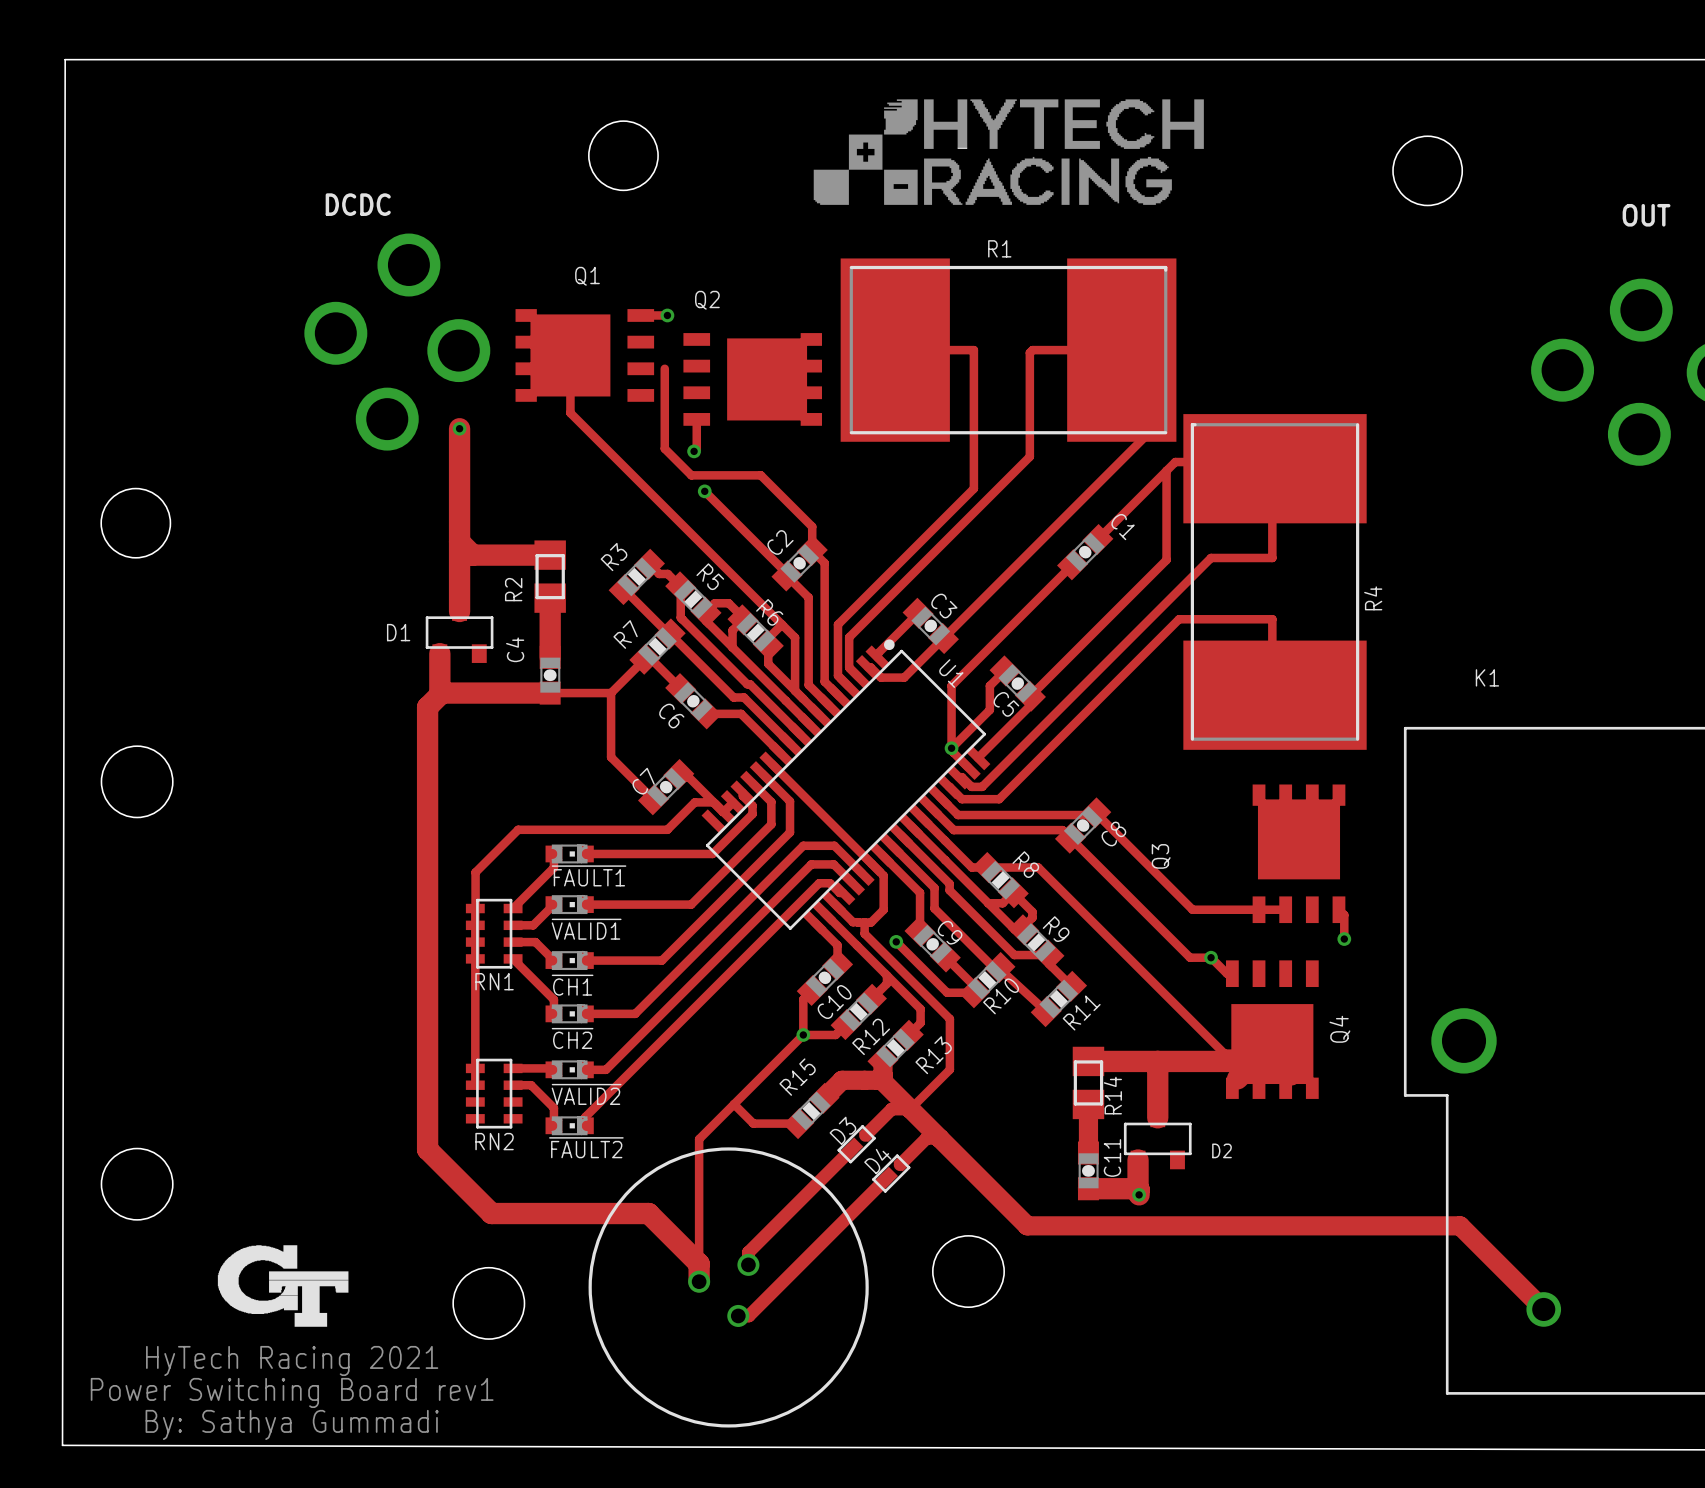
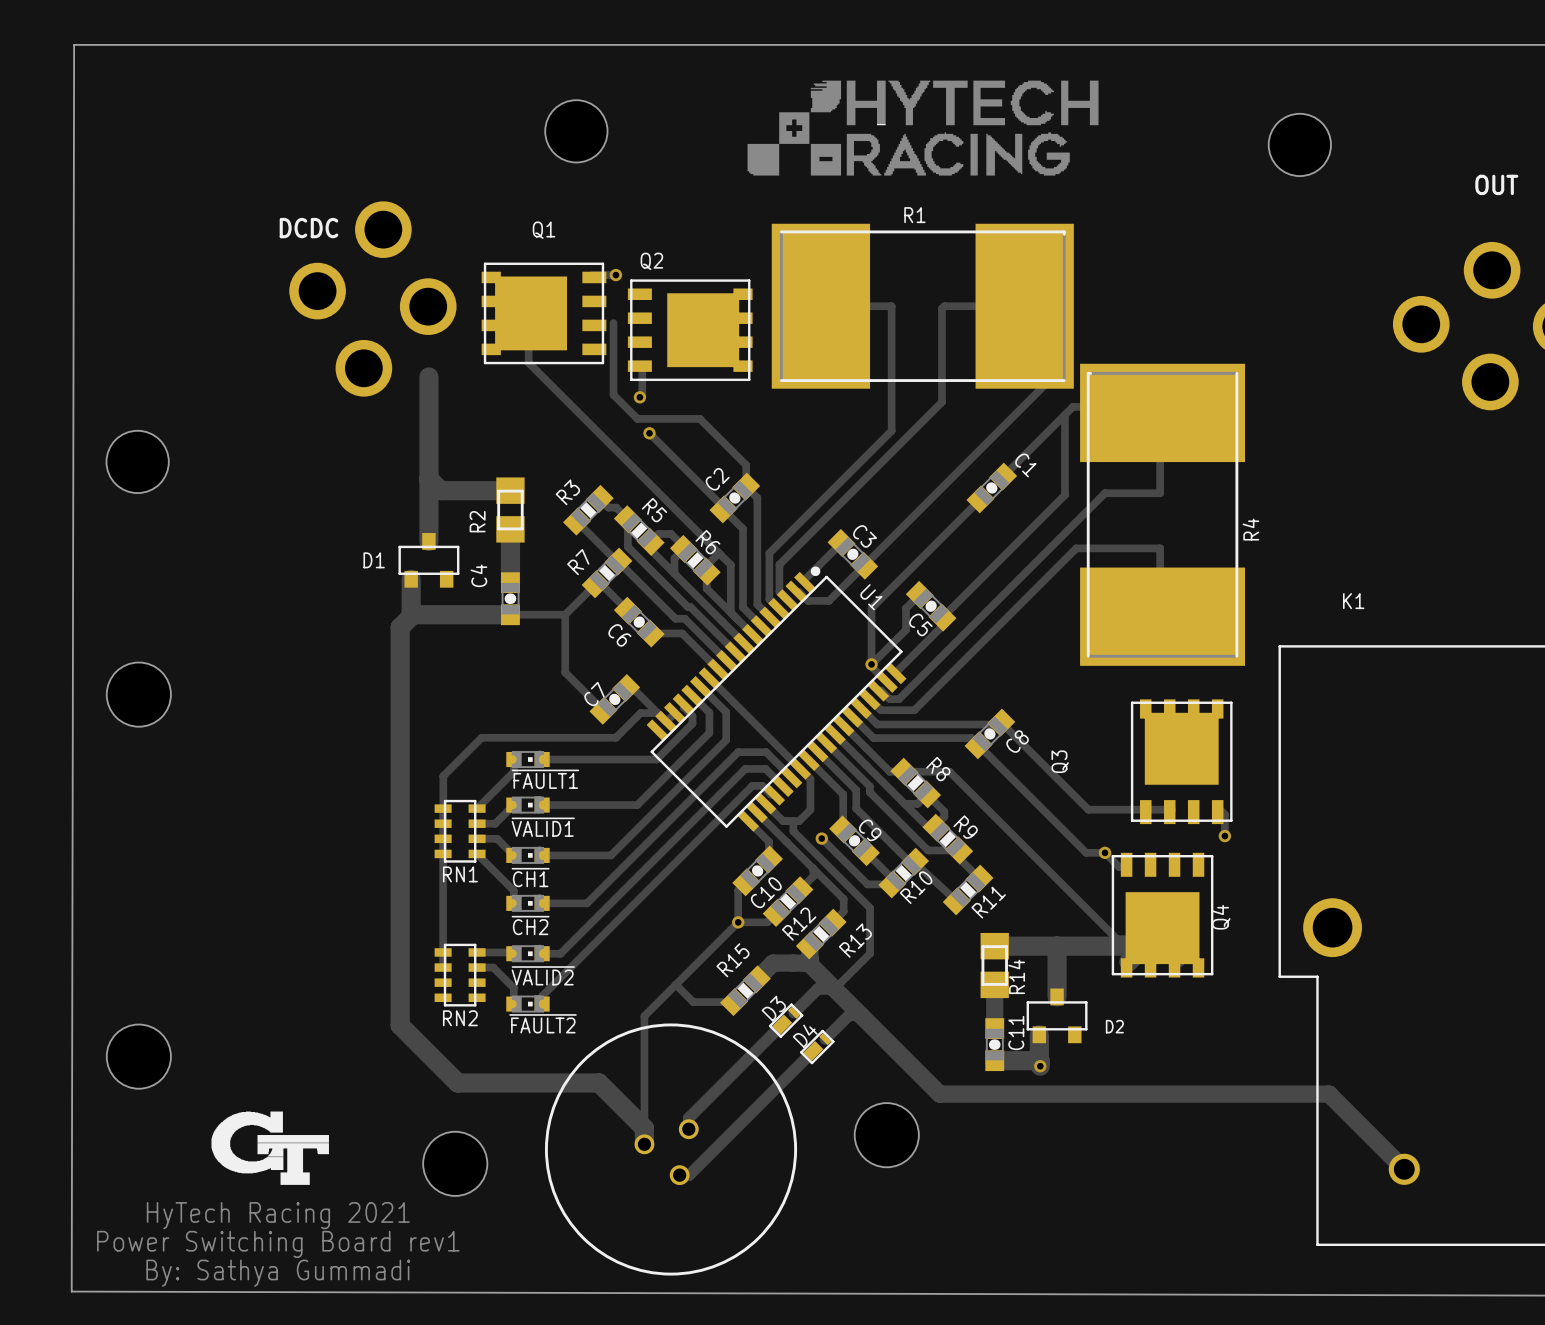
text position: DCDC (358, 204) -> DCDC (308, 228)
Q1 footprint: [515, 309, 655, 402] -> [481, 262, 607, 365]
Q2 footprint: [683, 333, 822, 426] -> [627, 279, 753, 382]
via: (459, 428) -> none
Q3 footprint: [1252, 784, 1346, 924] -> [1130, 699, 1233, 825]
Q4 footprint: [1225, 960, 1319, 1099] -> [1111, 852, 1214, 978]

